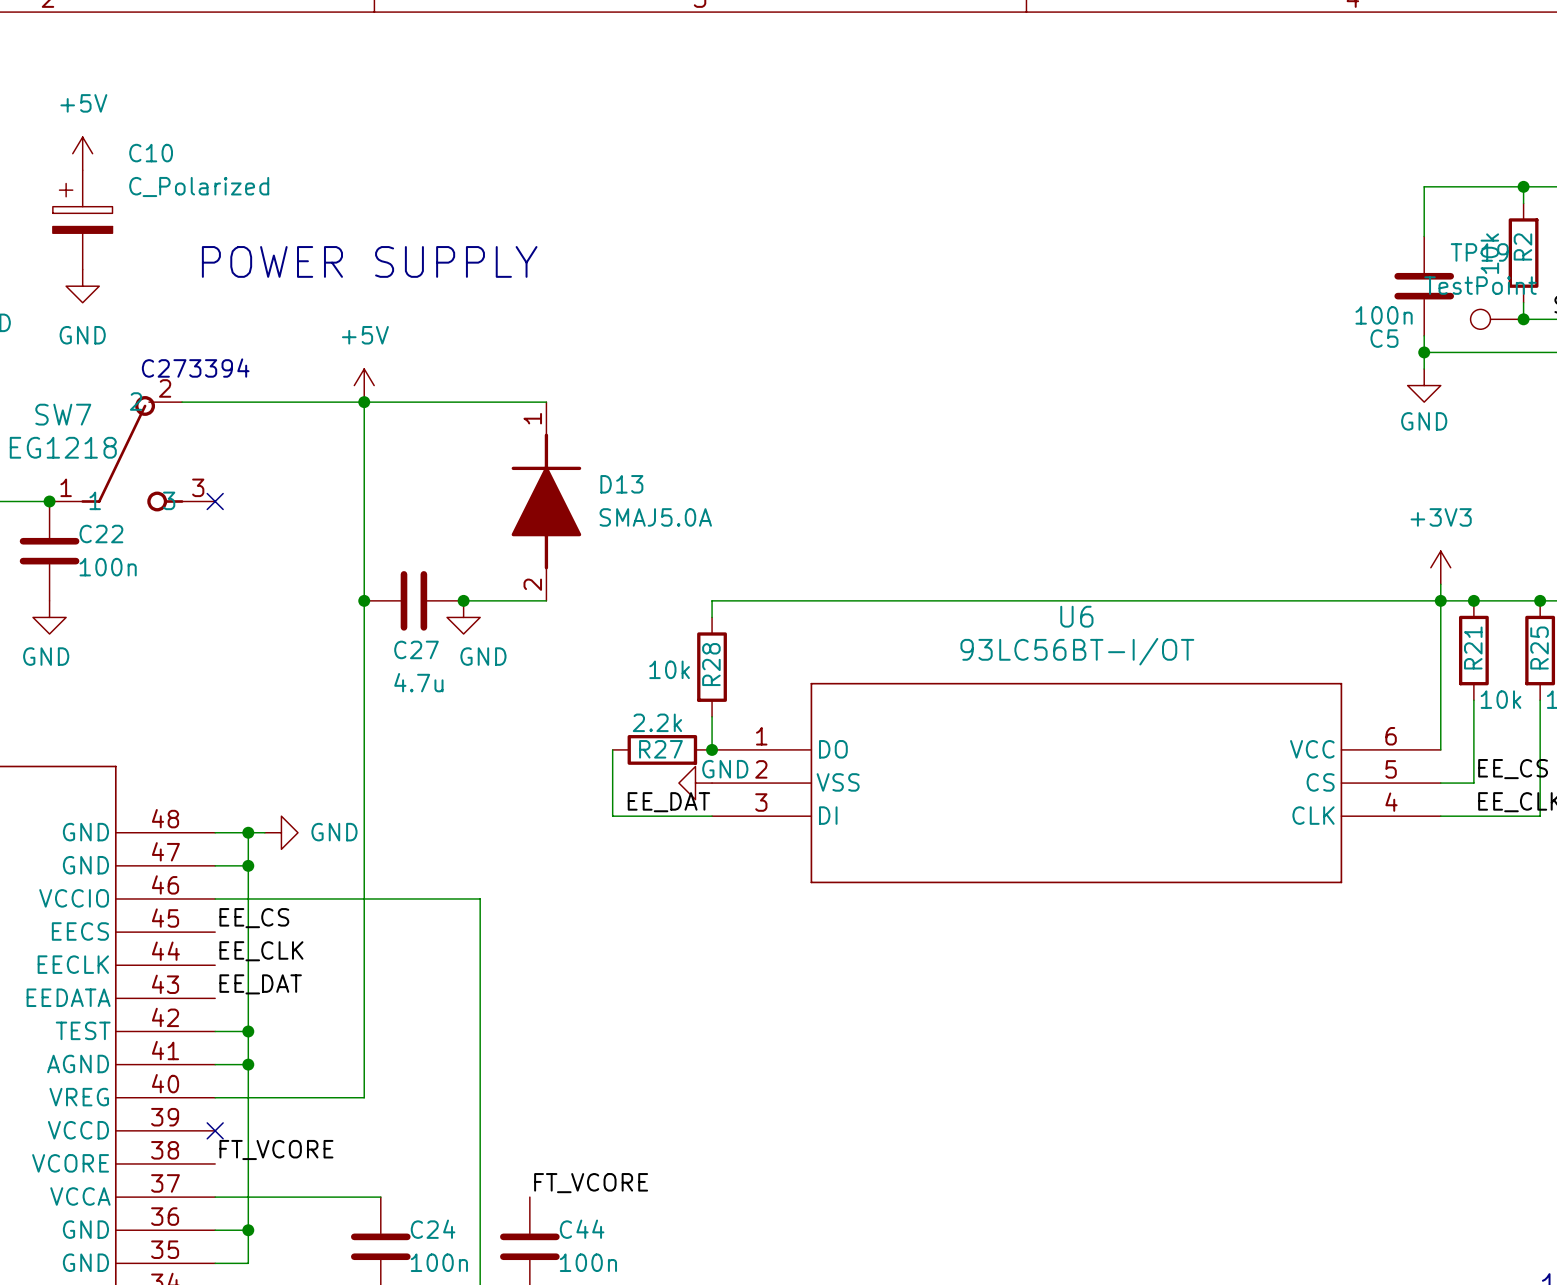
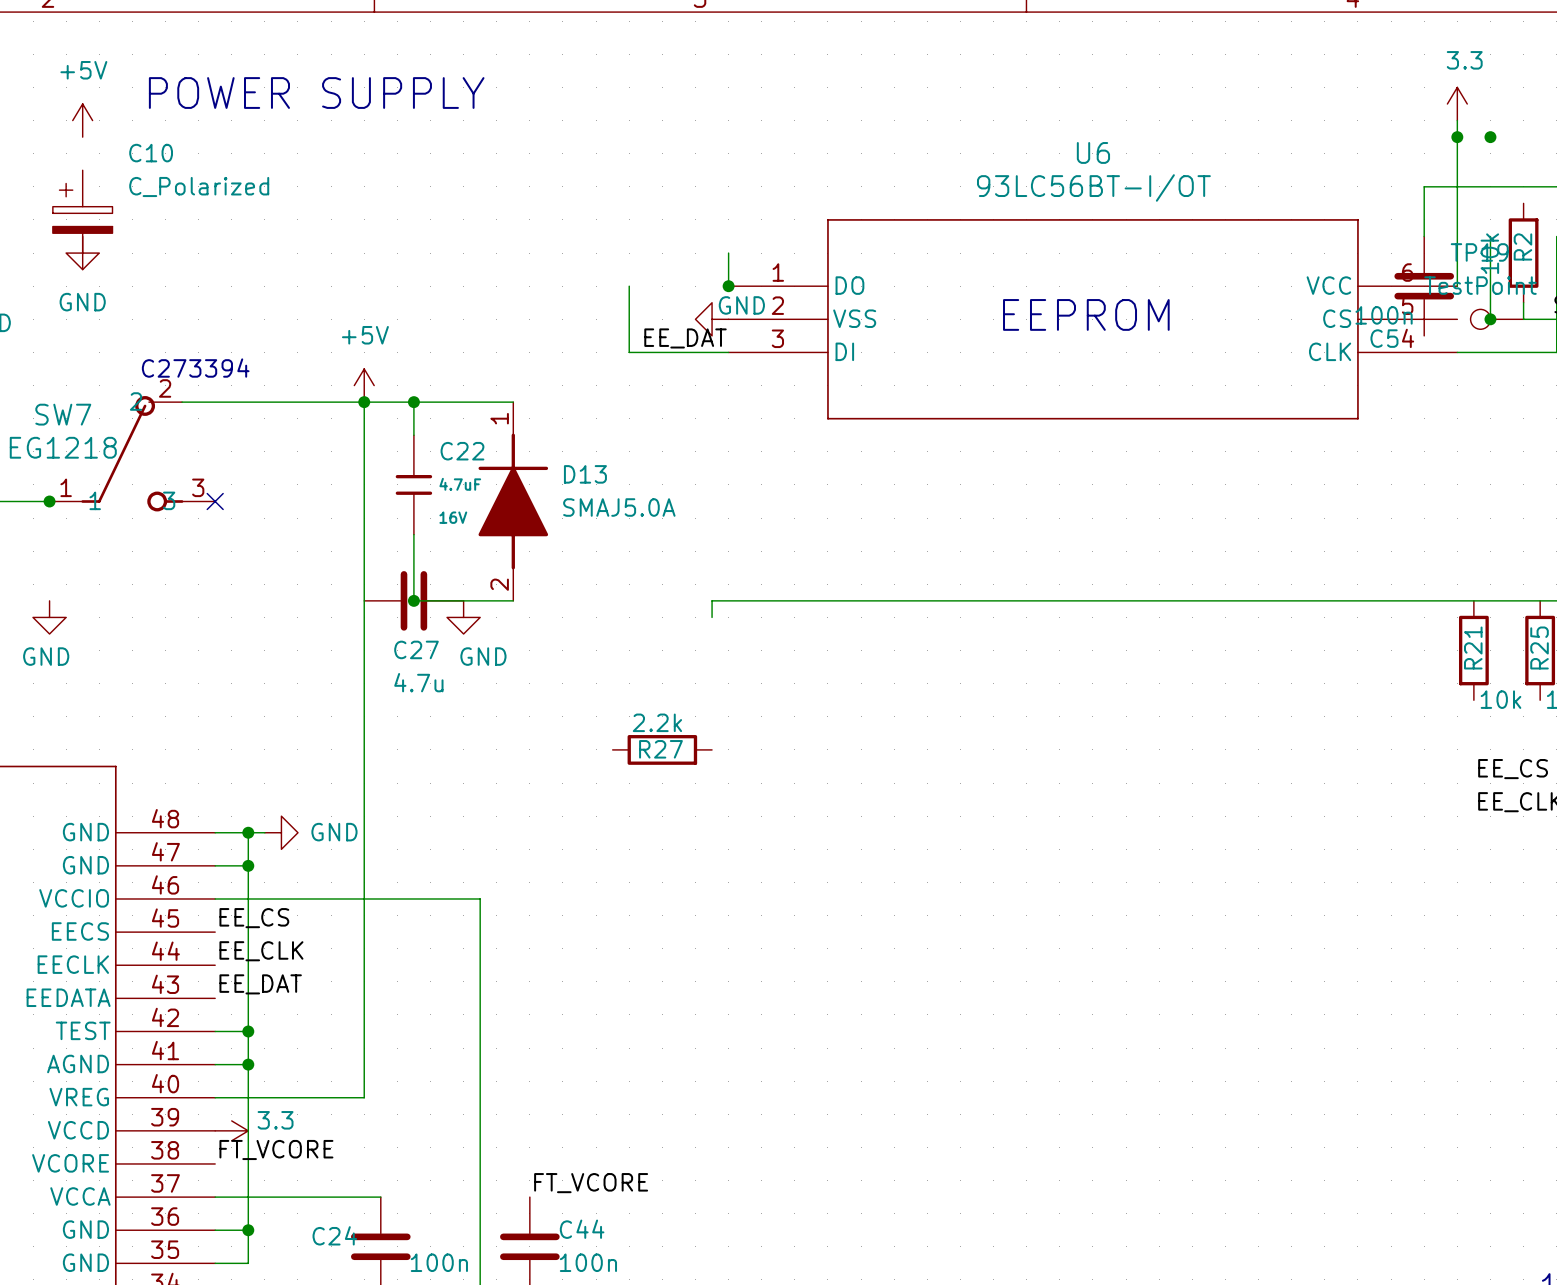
power symbol: none -> 3.3 (1457, 104)
wire: none -> (1457, 120) (1457, 286)
junction: none -> (1457, 137)
junction: none -> (1490, 137)
power symbol position: +5V (82, 153) -> +5V (82, 120)
wire: (1523, 186) (1523, 203) -> none
junction: (1523, 186) -> none
wire: none -> (1490, 236) (1490, 319)
wire: none -> (1556, 236) (1556, 352)
wire: none -> (728, 253) (728, 286)
text position: POWER SUPPLY (369, 261) -> POWER SUPPLY (316, 93)
power symbol position: GND (82, 286) -> GND (82, 253)
wire: none -> (629, 286) (629, 352) (728, 352)
junction: none -> (728, 286)
text: none -> EEPROM (1086, 314)
power symbol: none -> GND (712, 319)
junction position: (1523, 319) -> (1490, 319)
wire: (1424, 335) (1424, 369) -> none
label: none -> EE_DAT (685, 338)
junction: (1424, 352) -> none
power symbol: GND (1424, 385) -> none
wire: none -> (413, 402) (413, 435)
junction: none -> (413, 402)
wire: (513, 402) (546, 402) -> none
D13 name position: D13 (621, 484) -> D13 (585, 474)
C22 symbol: [19, 501, 80, 601] -> [395, 435, 433, 535]
D13 position: (546, 501) -> (513, 501)
C22 text: none -> 16V (453, 517)
D13 value position: SMAJ5.0A (655, 517) -> SMAJ5.0A (619, 507)
wire: none -> (413, 534) (413, 600) (463, 600)
C22 value: 100n (108, 567) -> 4.7uF (460, 484)
power symbol: +3V3 (1440, 567) -> none
wire: (1440, 584) (1440, 749) -> none
junction: (364, 600) -> none
junction: none -> (413, 600)
junction: (463, 600) -> none
wire: (513, 600) (546, 600) -> none
junction: (1440, 600) -> none
junction: (1473, 600) -> none
junction: (1540, 600) -> none
R28: 10k (712, 667) -> none
wire: (1473, 700) (1473, 783) (1440, 783) -> none
wire: (1540, 700) (1540, 816) (1440, 816) -> none
wire: (712, 716) (712, 749) -> none
wire: (612, 749) (612, 816) (712, 816) -> none
junction: (712, 749) -> none
power symbol: GND (695, 783) -> none
U6 position: (1076, 783) -> (1092, 319)
label: EE_DAT (668, 802) -> none
no-connect mark: (215, 1130) -> none
power symbol: none -> 3.3 (231, 1130)
C24 name position: C24 (433, 1229) -> C24 (334, 1235)

